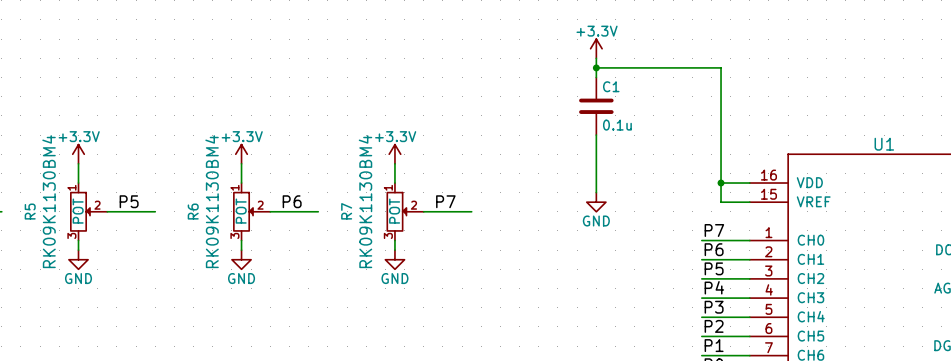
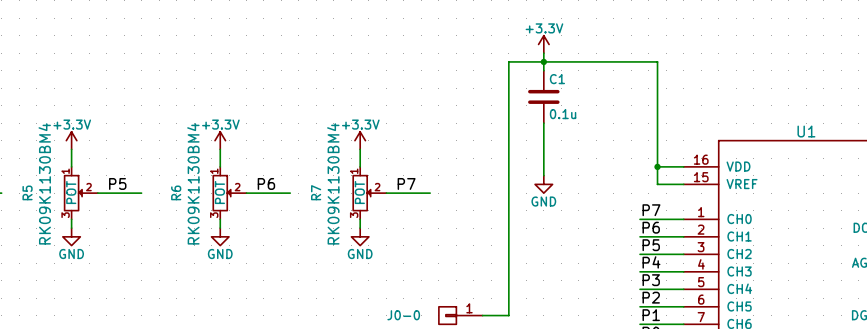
wire: none -> (543, 61) (508, 61) (508, 315) (482, 315)
J0-0: none -> (460, 315)

